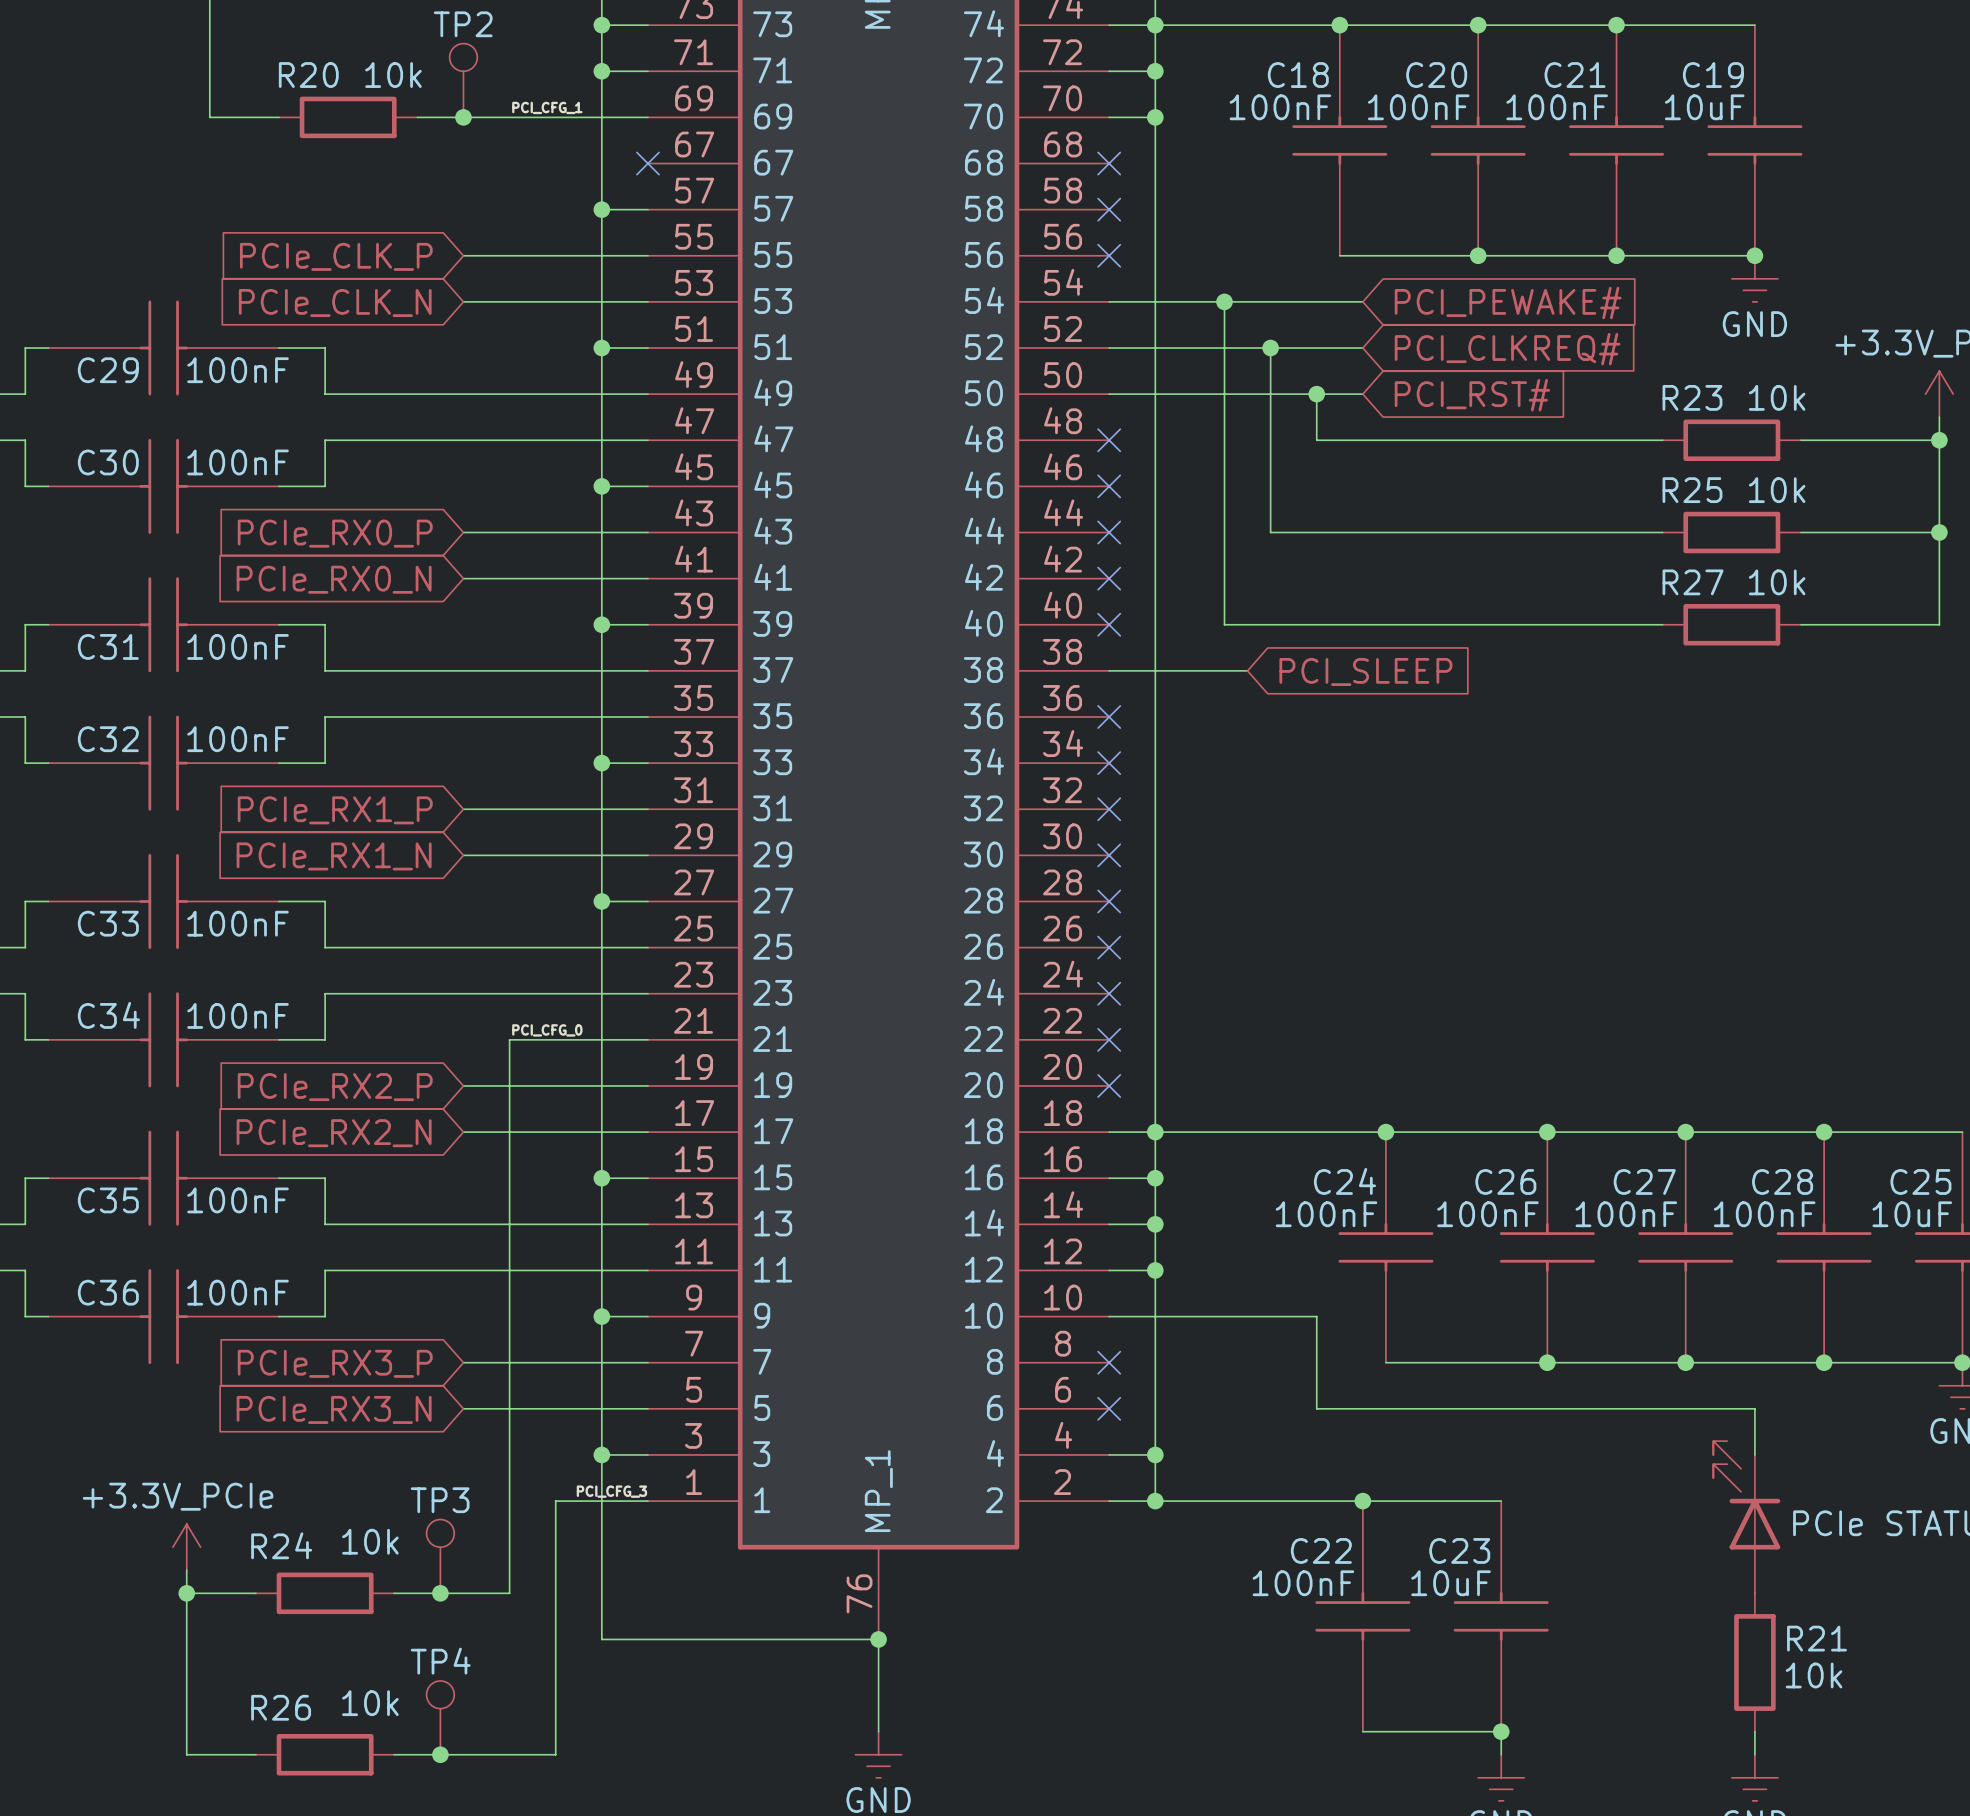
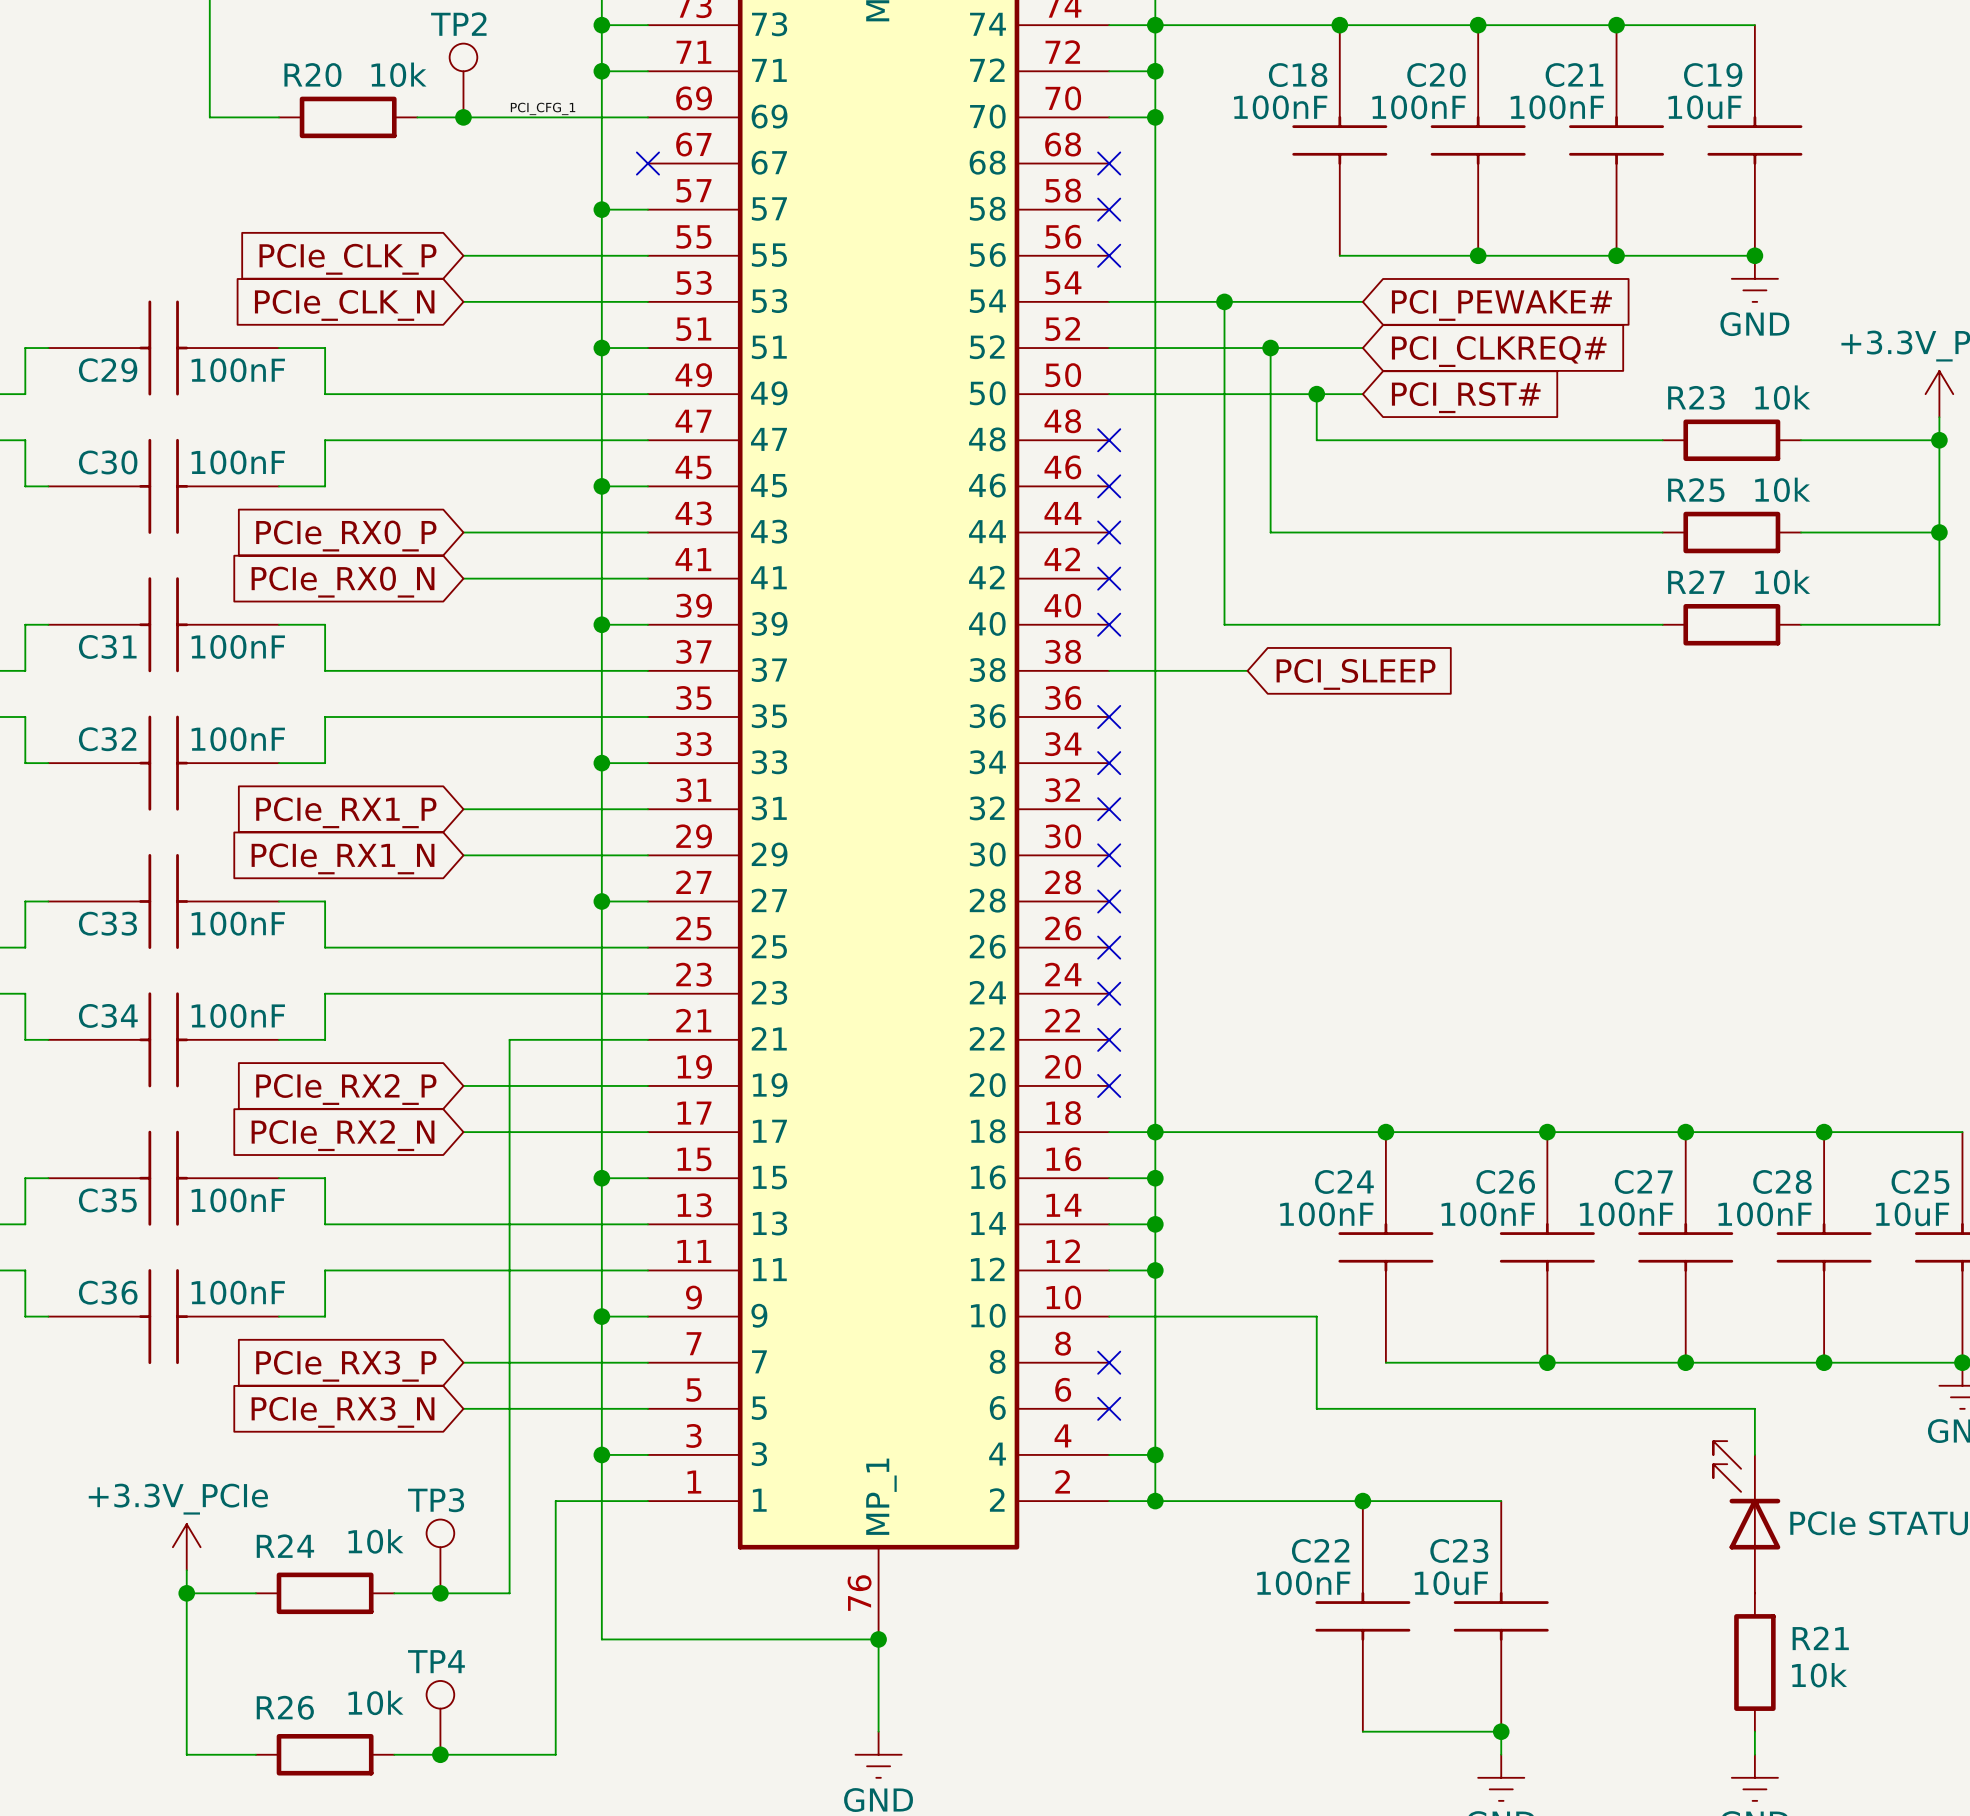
label: PCI_CFG_0 (547, 1030) -> none
label: PCI_CFG_3 (611, 1491) -> none

